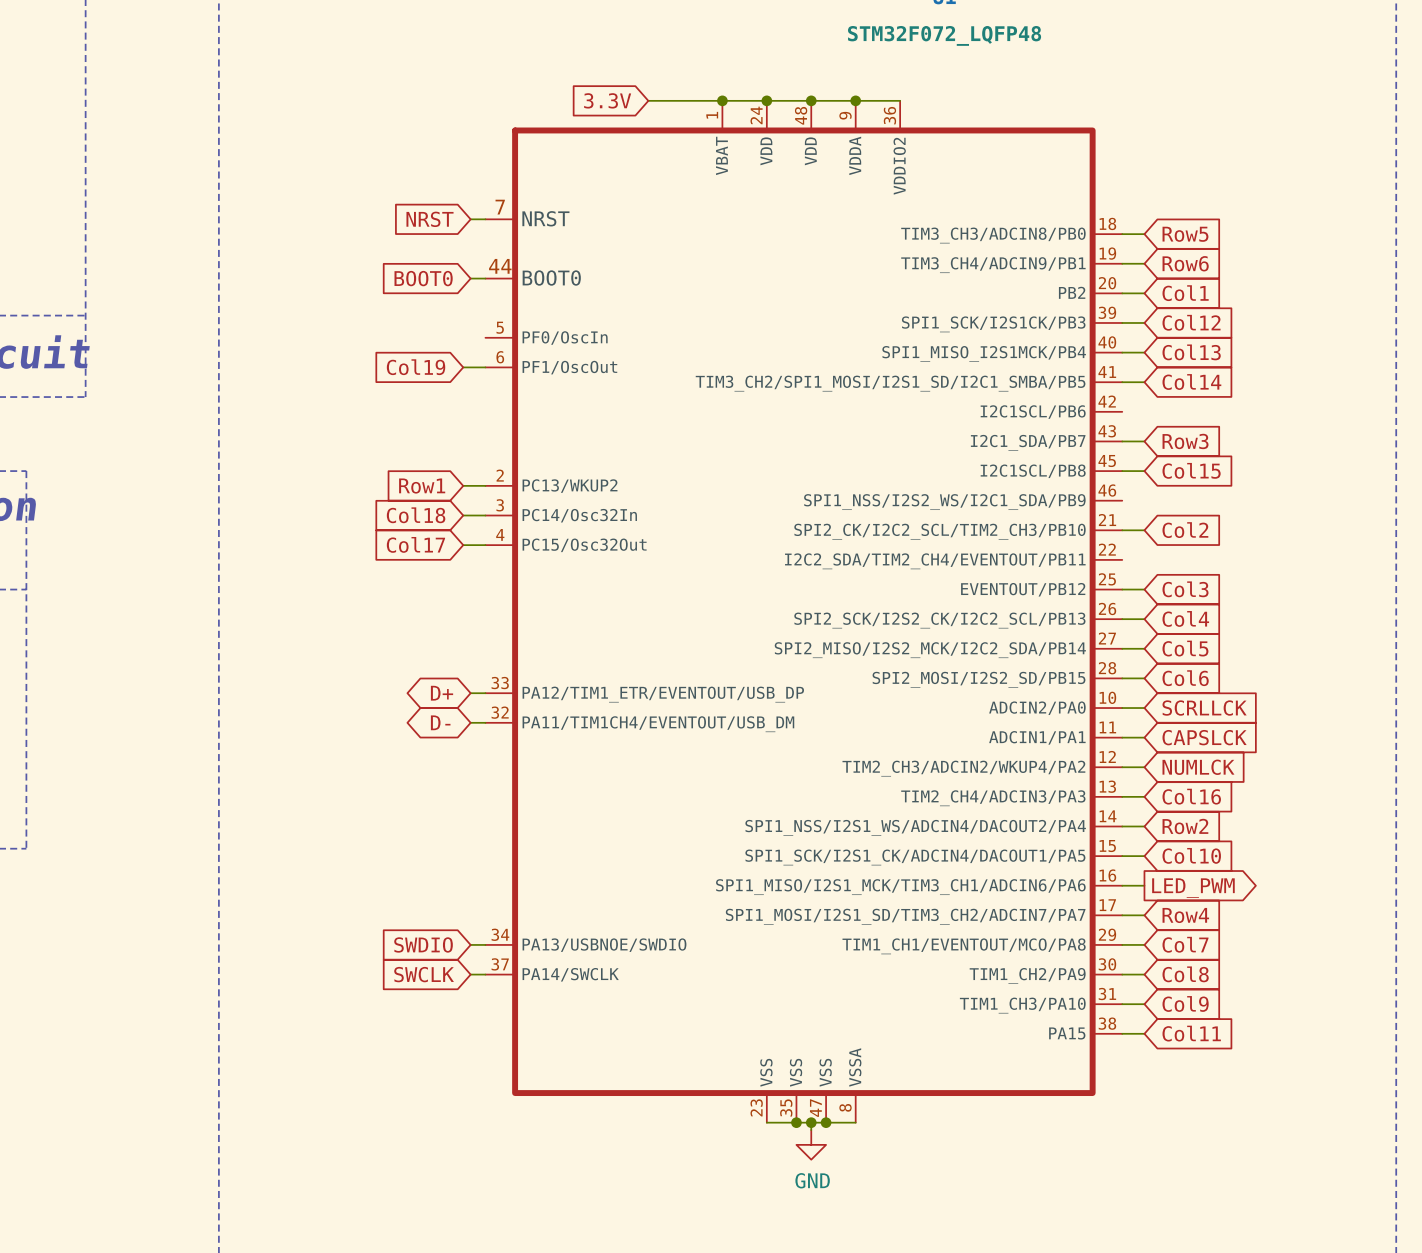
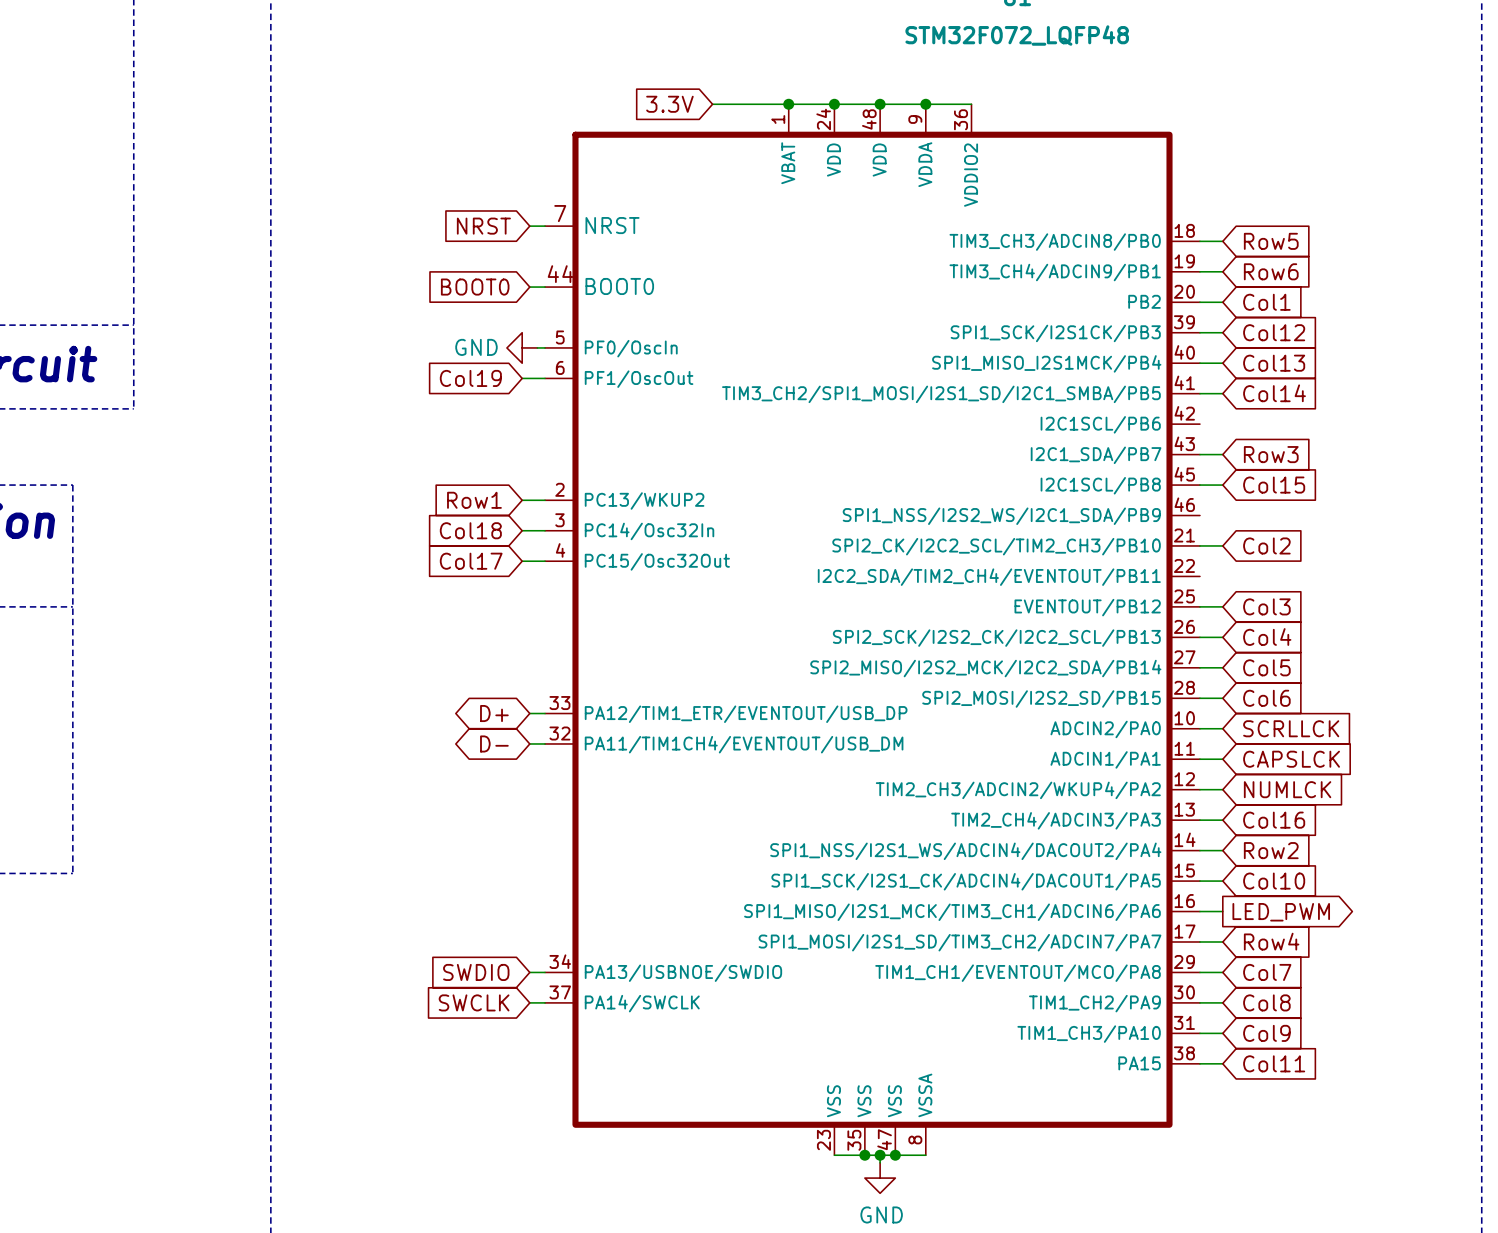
power symbol: none -> GND (522, 347)
wire: none -> (537, 347) (545, 347)

